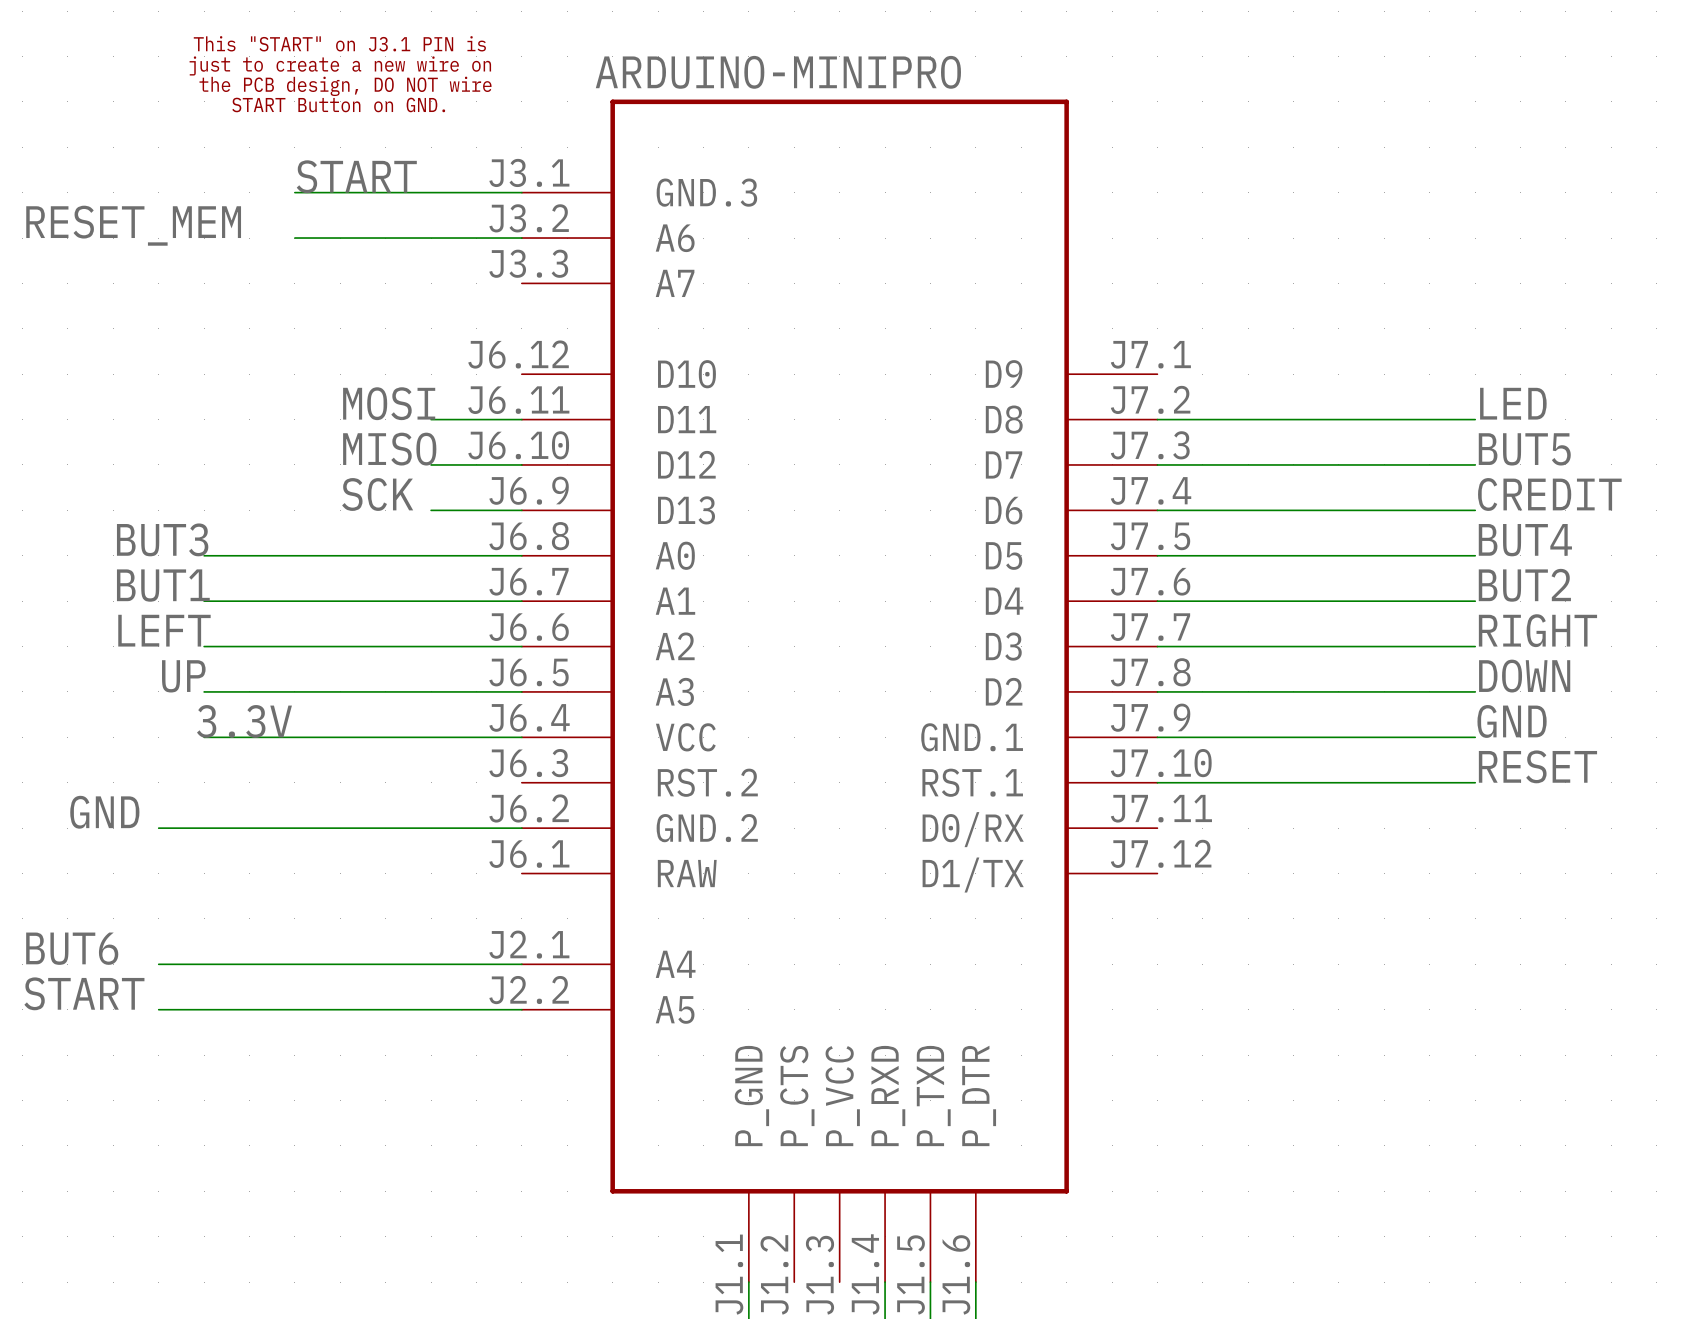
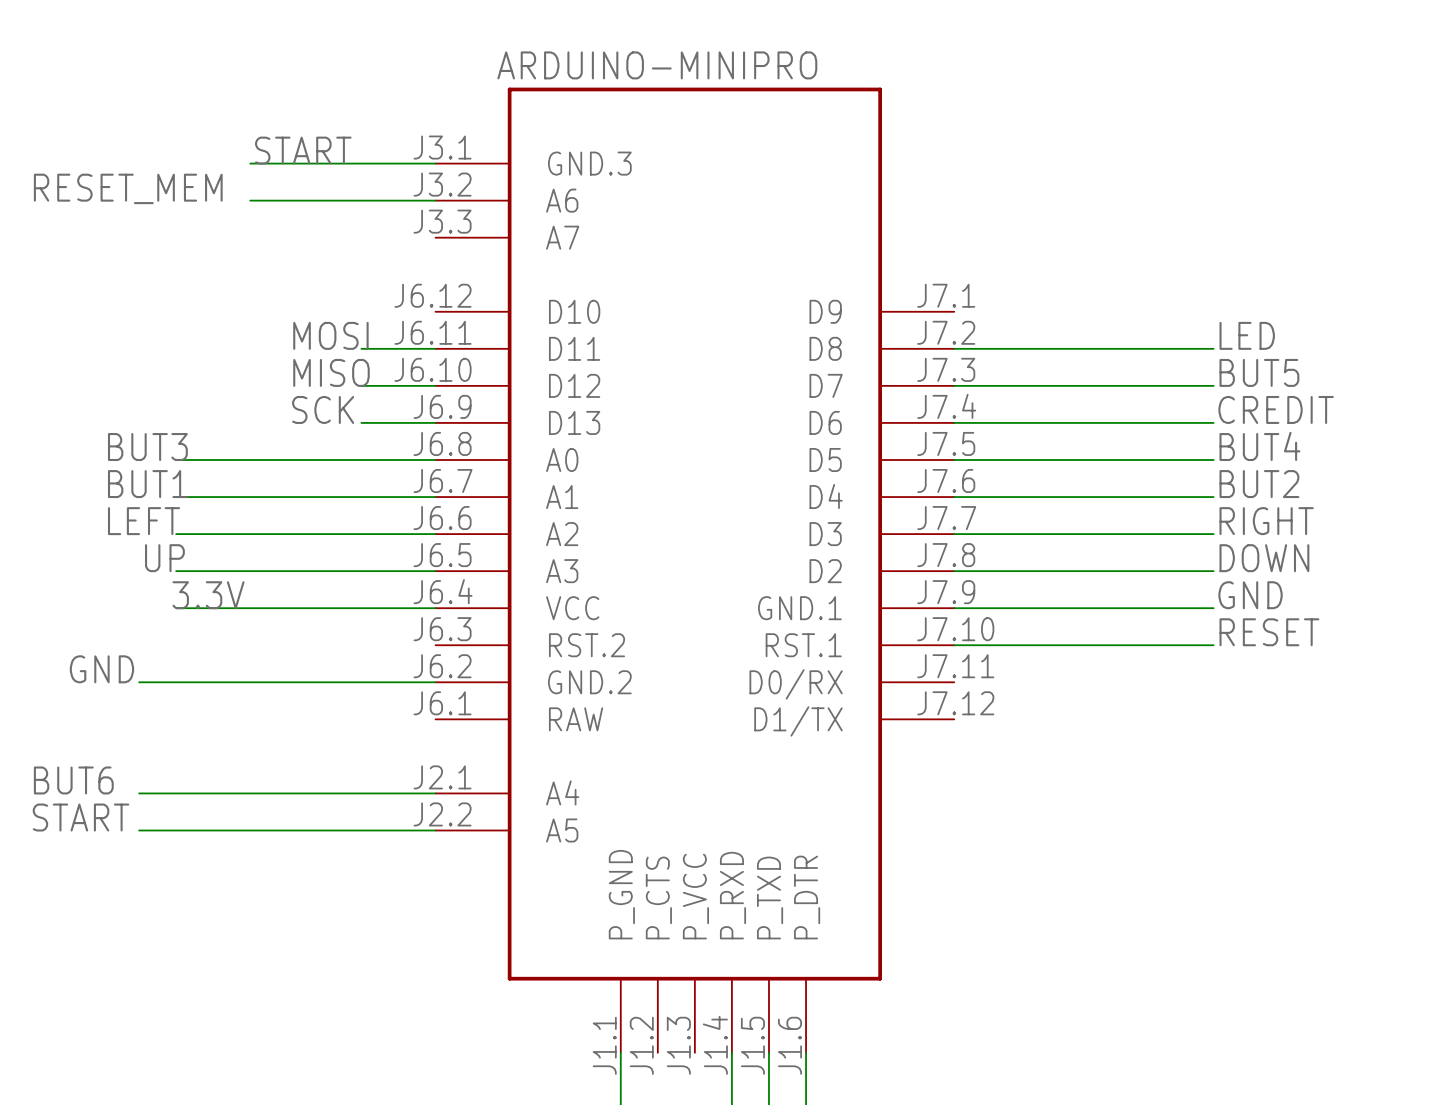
text: This "START" on J3.1 PIN is (339, 43) -> none
text: just to create a new wire on (340, 65) -> none
text: the PCB design, DO NOT wire (345, 86) -> none
text: START Button on GND. (338, 104) -> none

